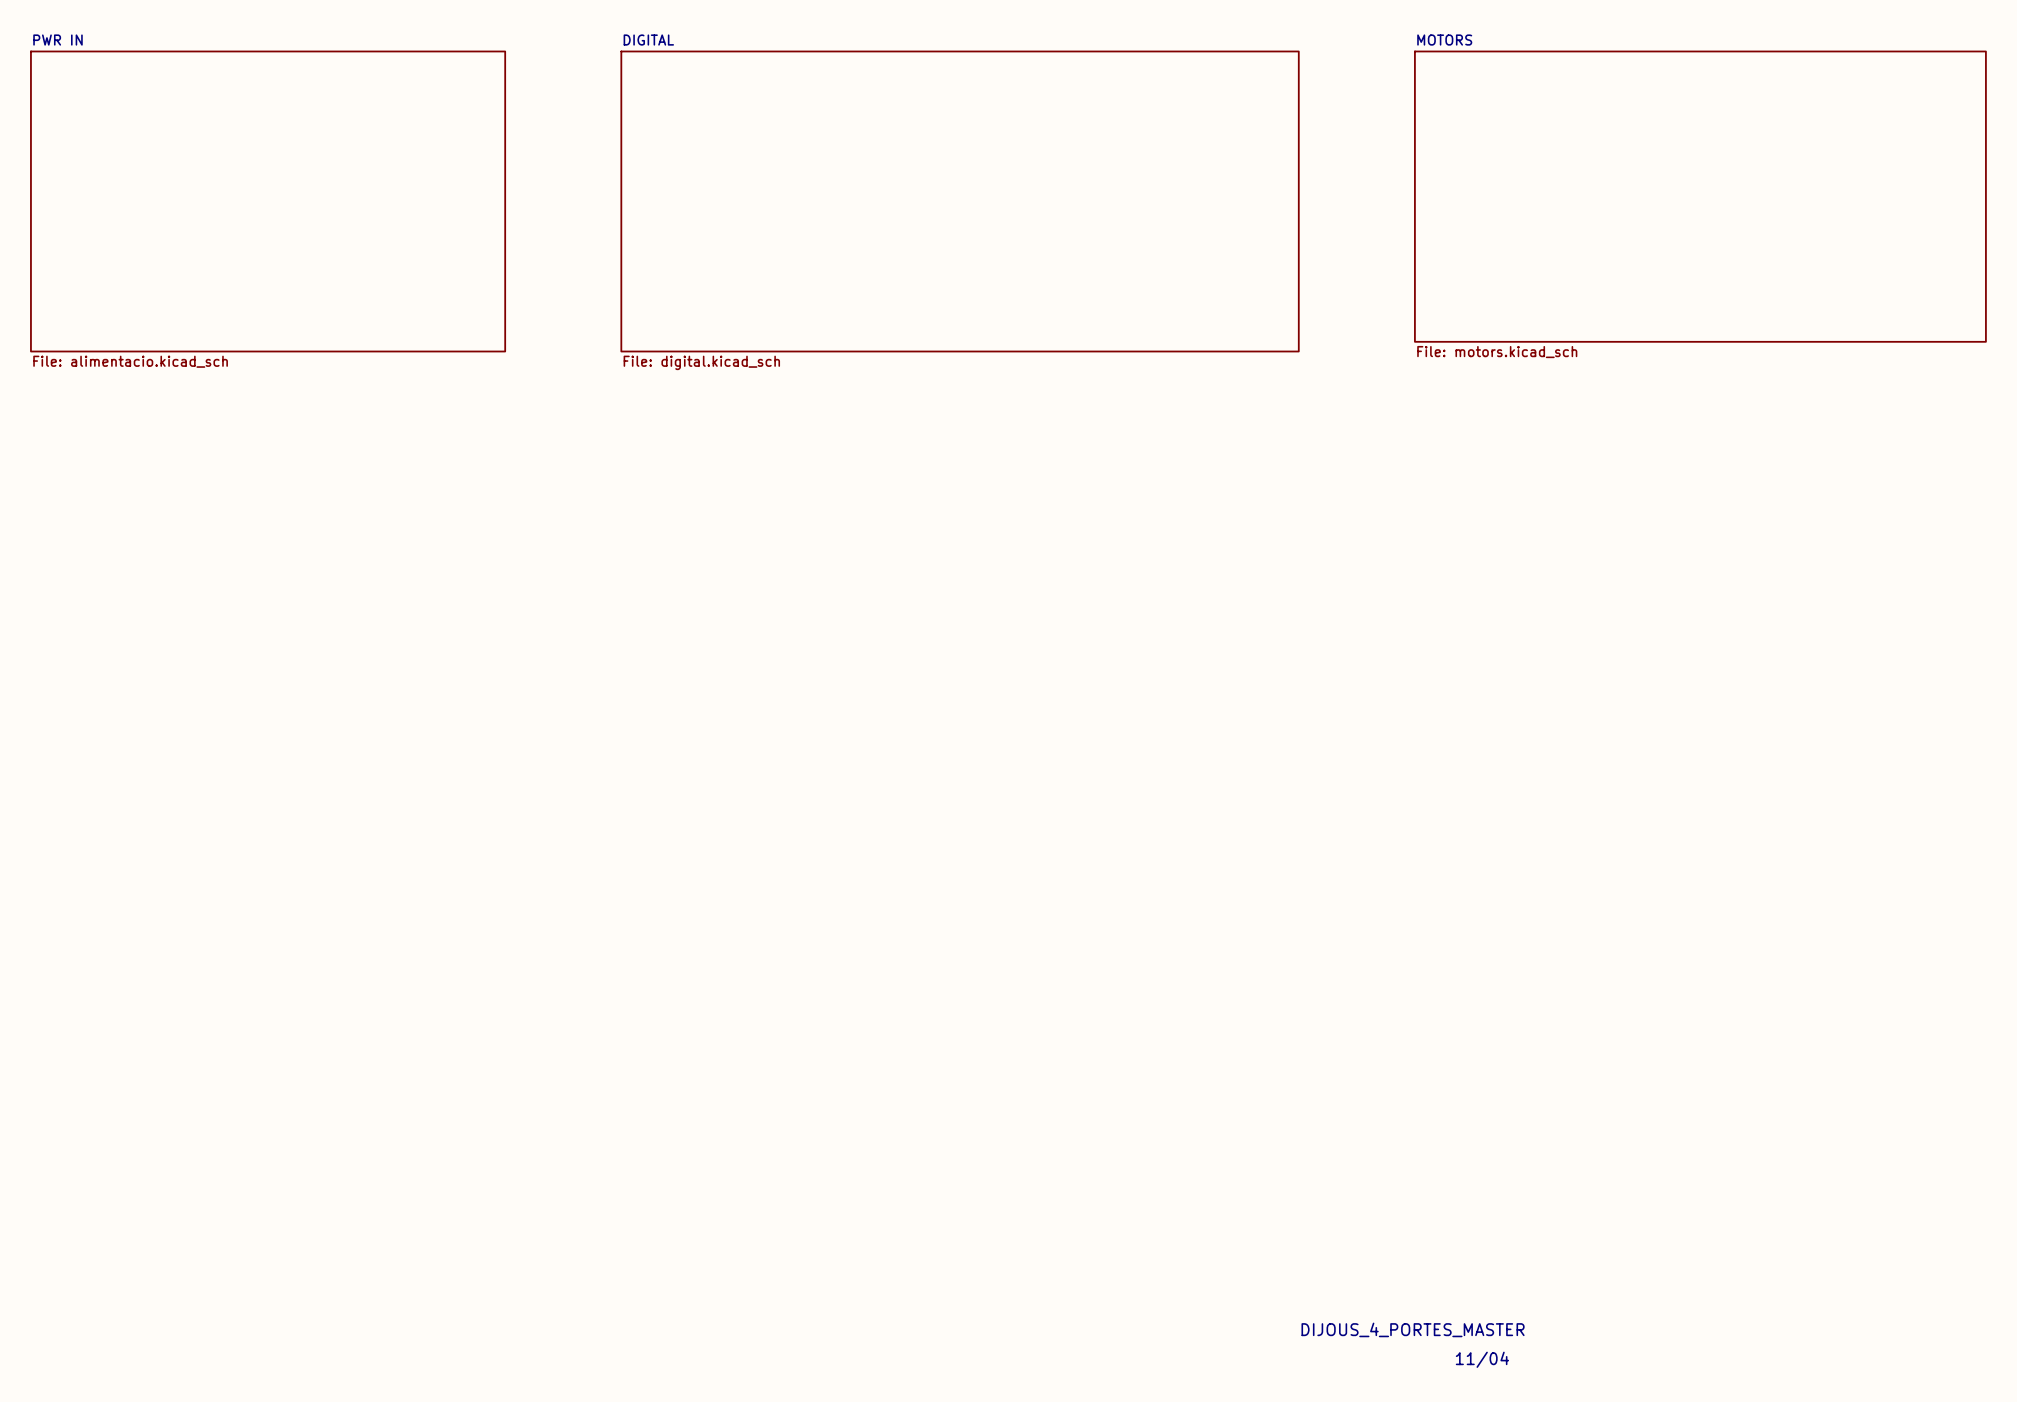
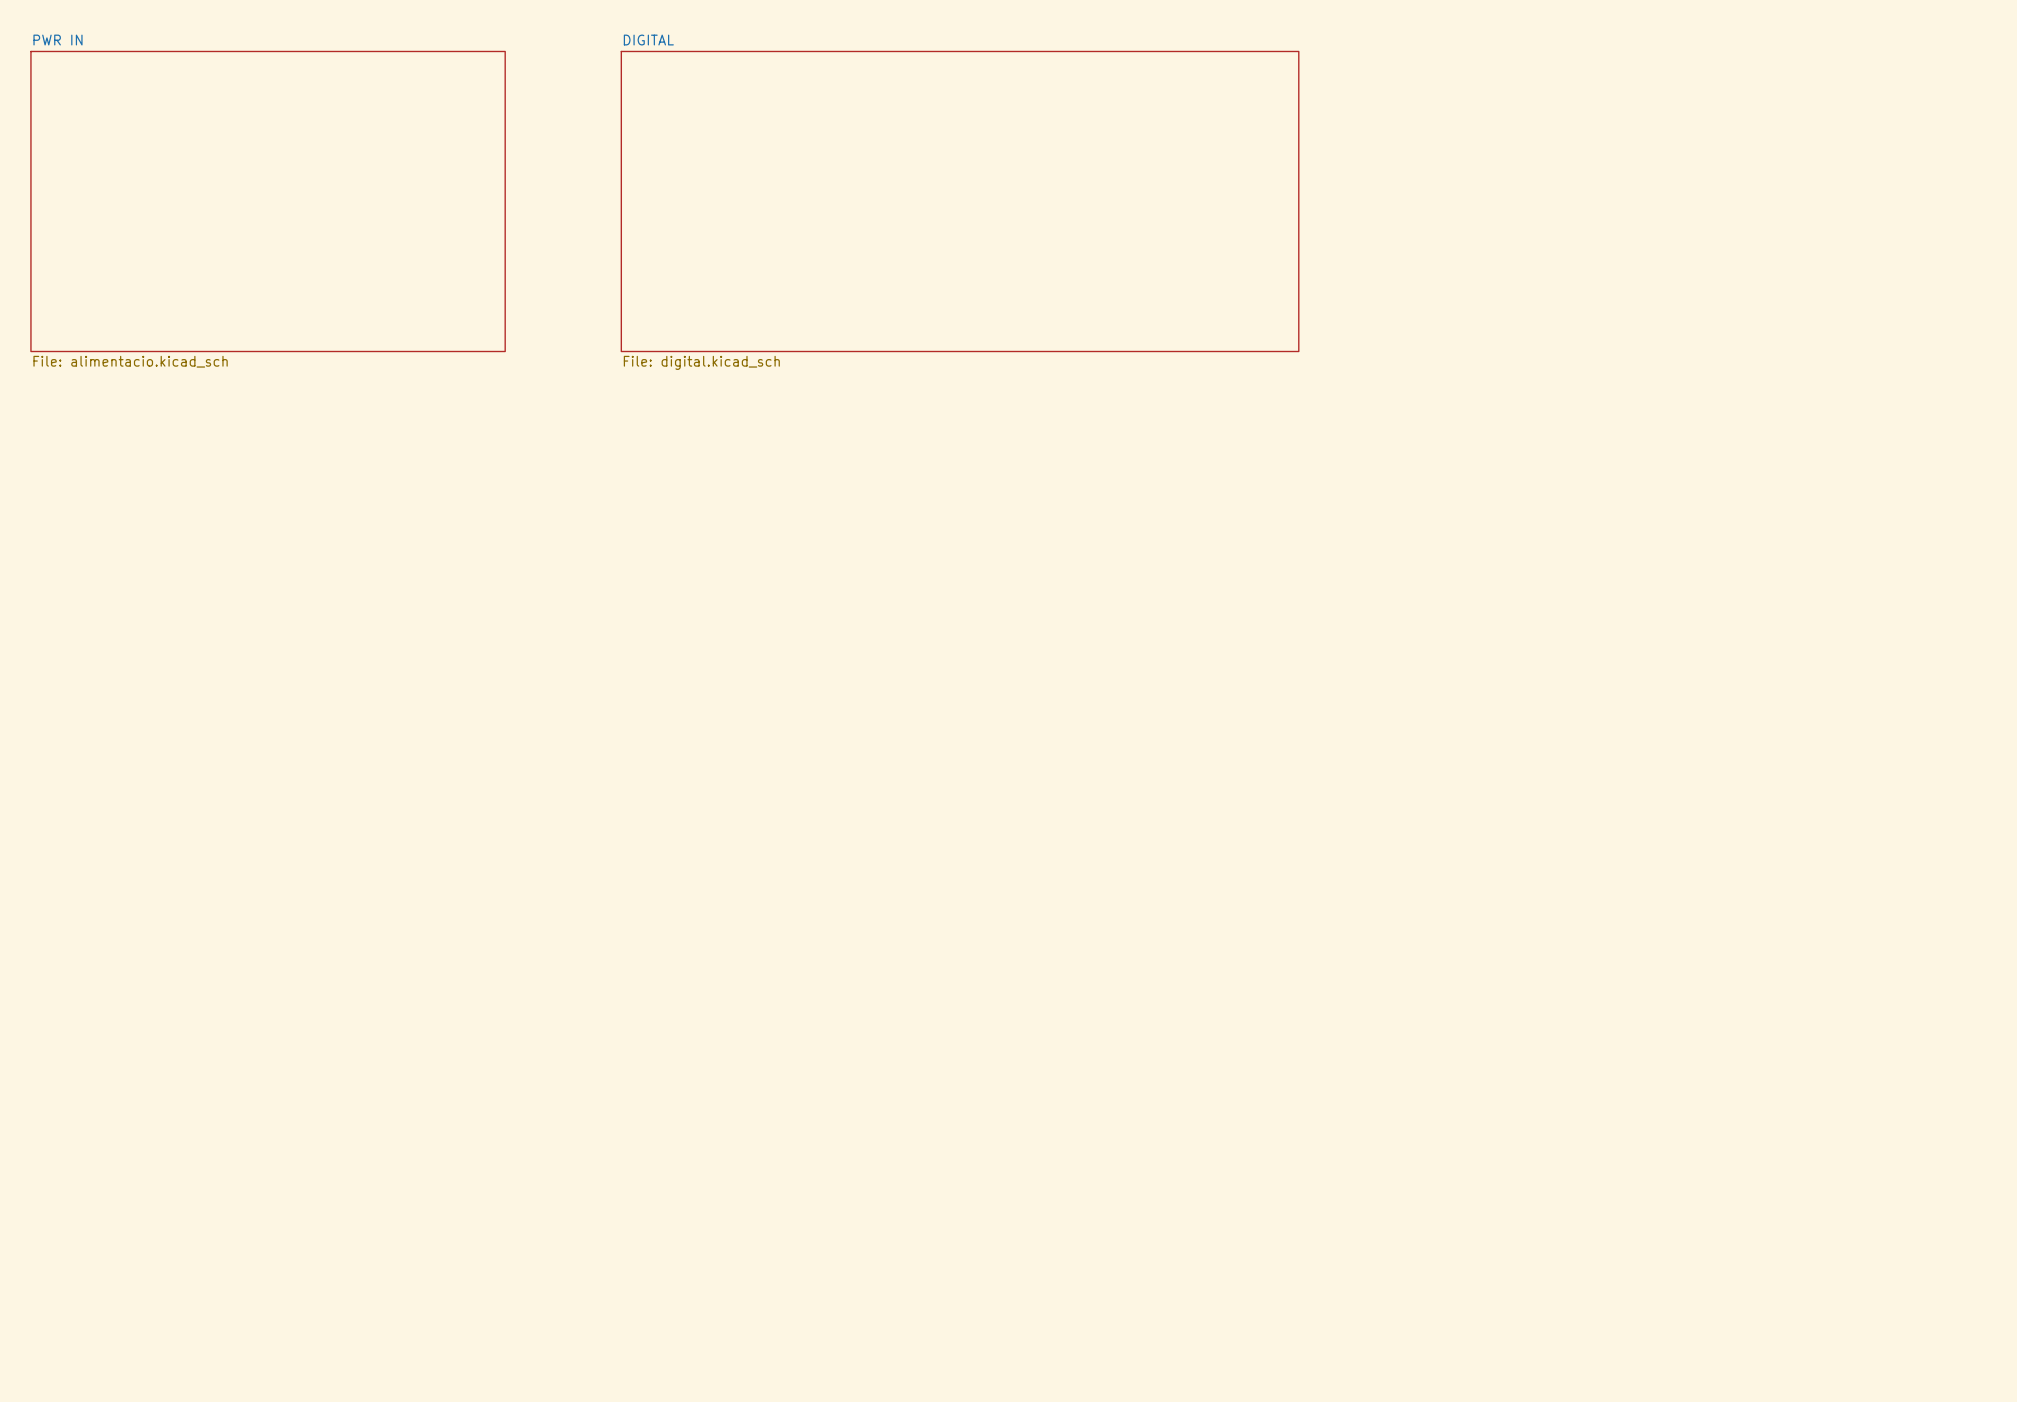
sheet MOTORS: File: motors.kicad_sch (1700, 196) -> none
text: DIJOUS_4_PORTES_MASTER (1413, 1329) -> none
text: 11/04 (1482, 1359) -> none

